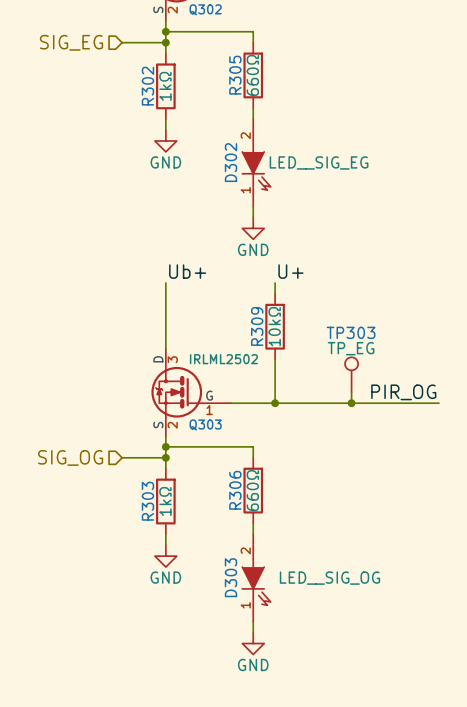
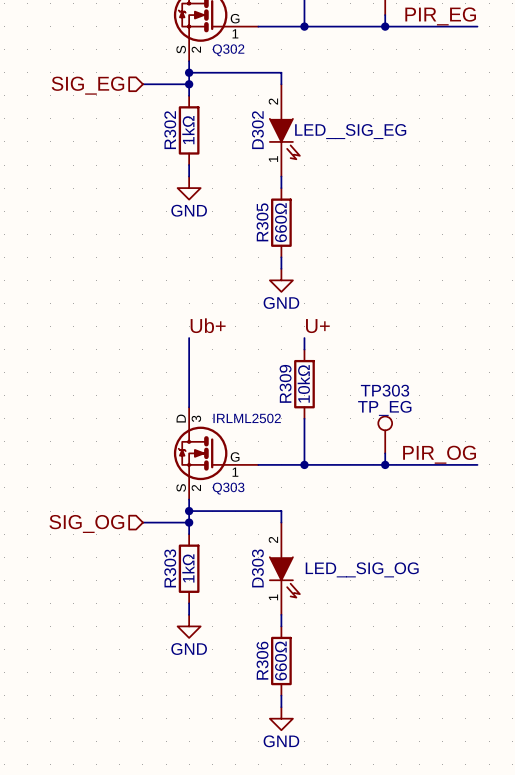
R305 position: (253, 75) -> (281, 222)
D302 position: (256, 162) -> (284, 130)
R306 position: (253, 490) -> (281, 661)
D303 position: (256, 577) -> (284, 568)

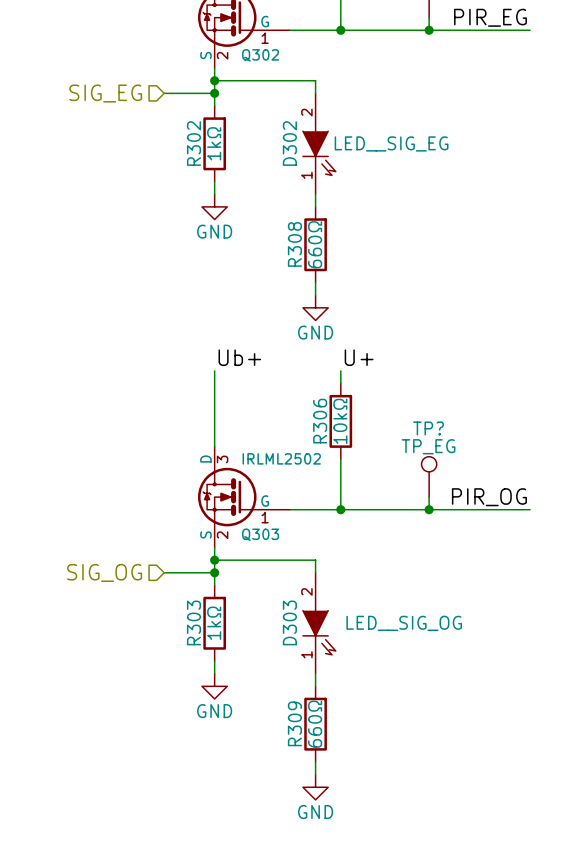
R305 name: R305 (262, 222) -> R308 (294, 244)
R309 name: R309 (285, 383) -> R306 (320, 421)
TP303 name: TP303 (385, 390) -> TP? (428, 428)
R306 name: R306 (262, 660) -> R309 (294, 723)

